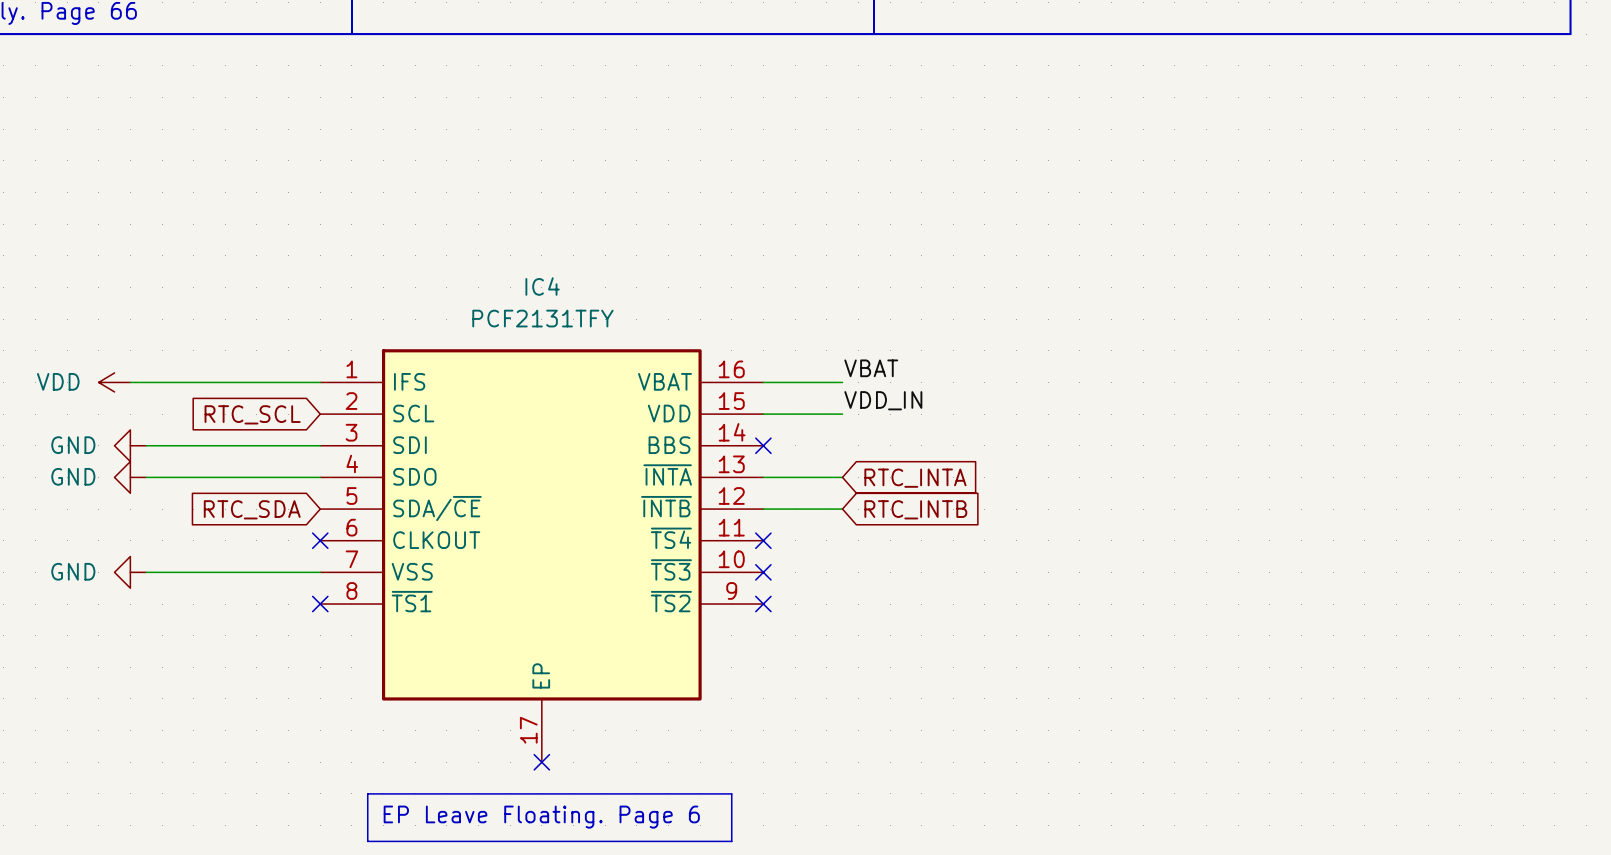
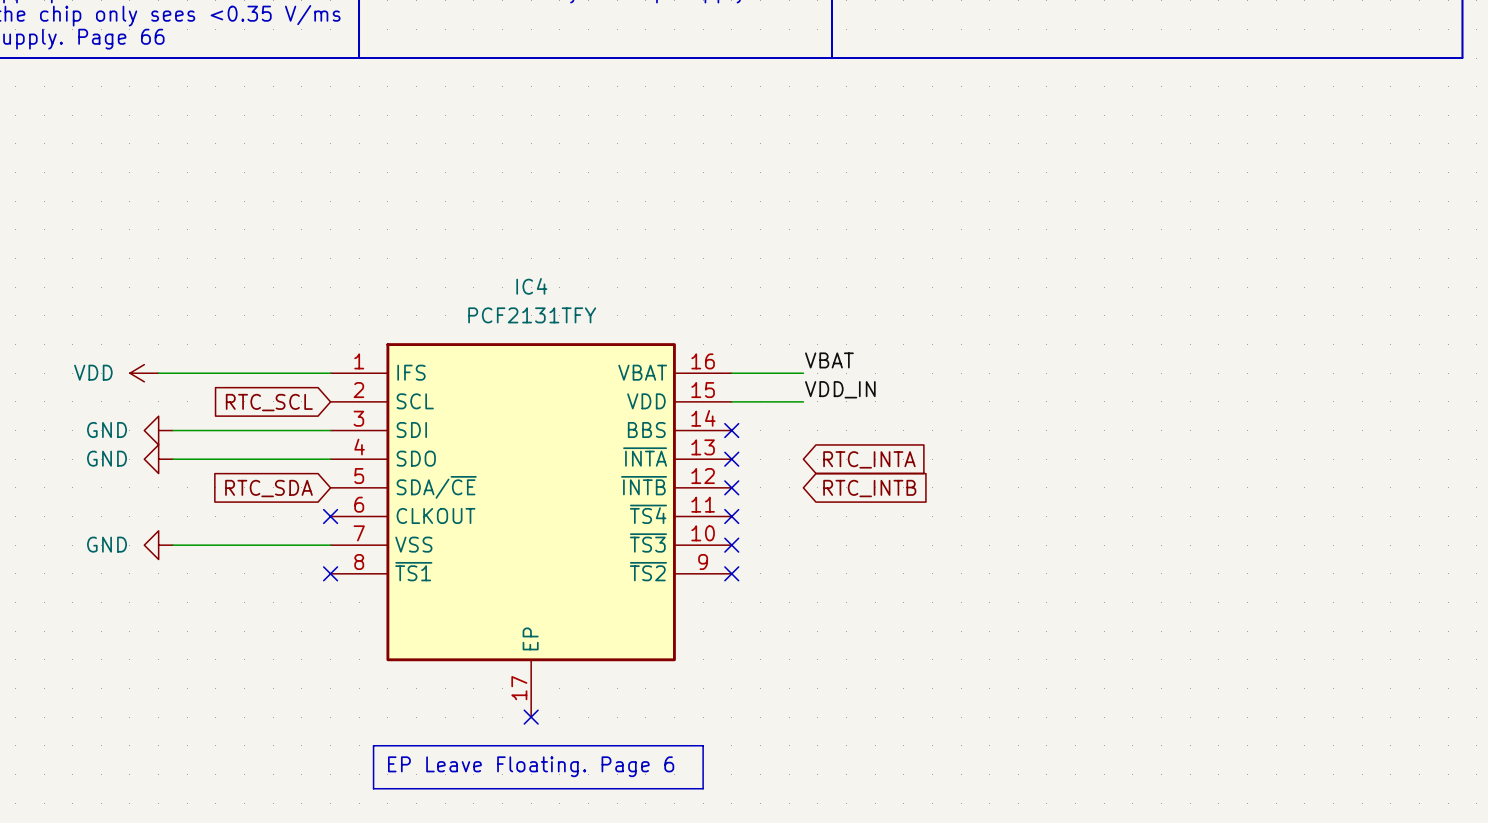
wire: (763, 477) (842, 477) -> none
no-connect mark: none -> (731, 459)
wire: (763, 509) (842, 509) -> none
no-connect mark: none -> (731, 487)

